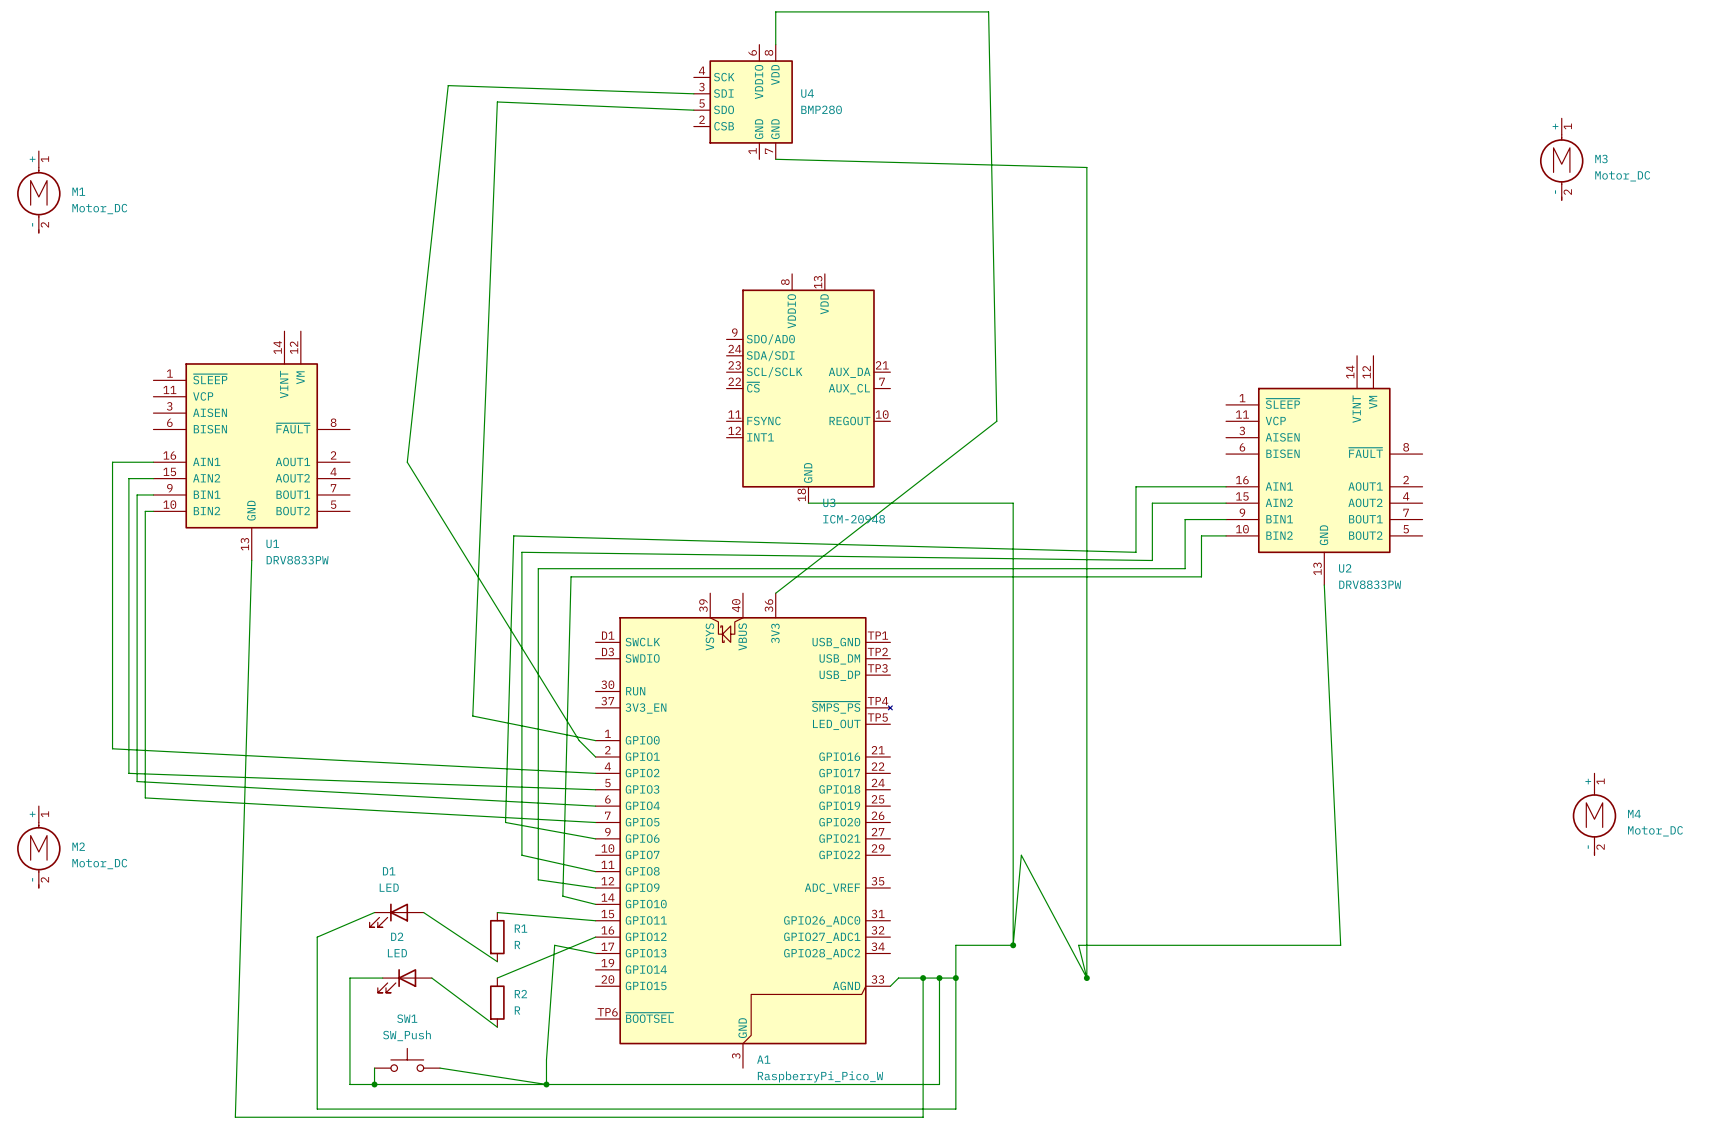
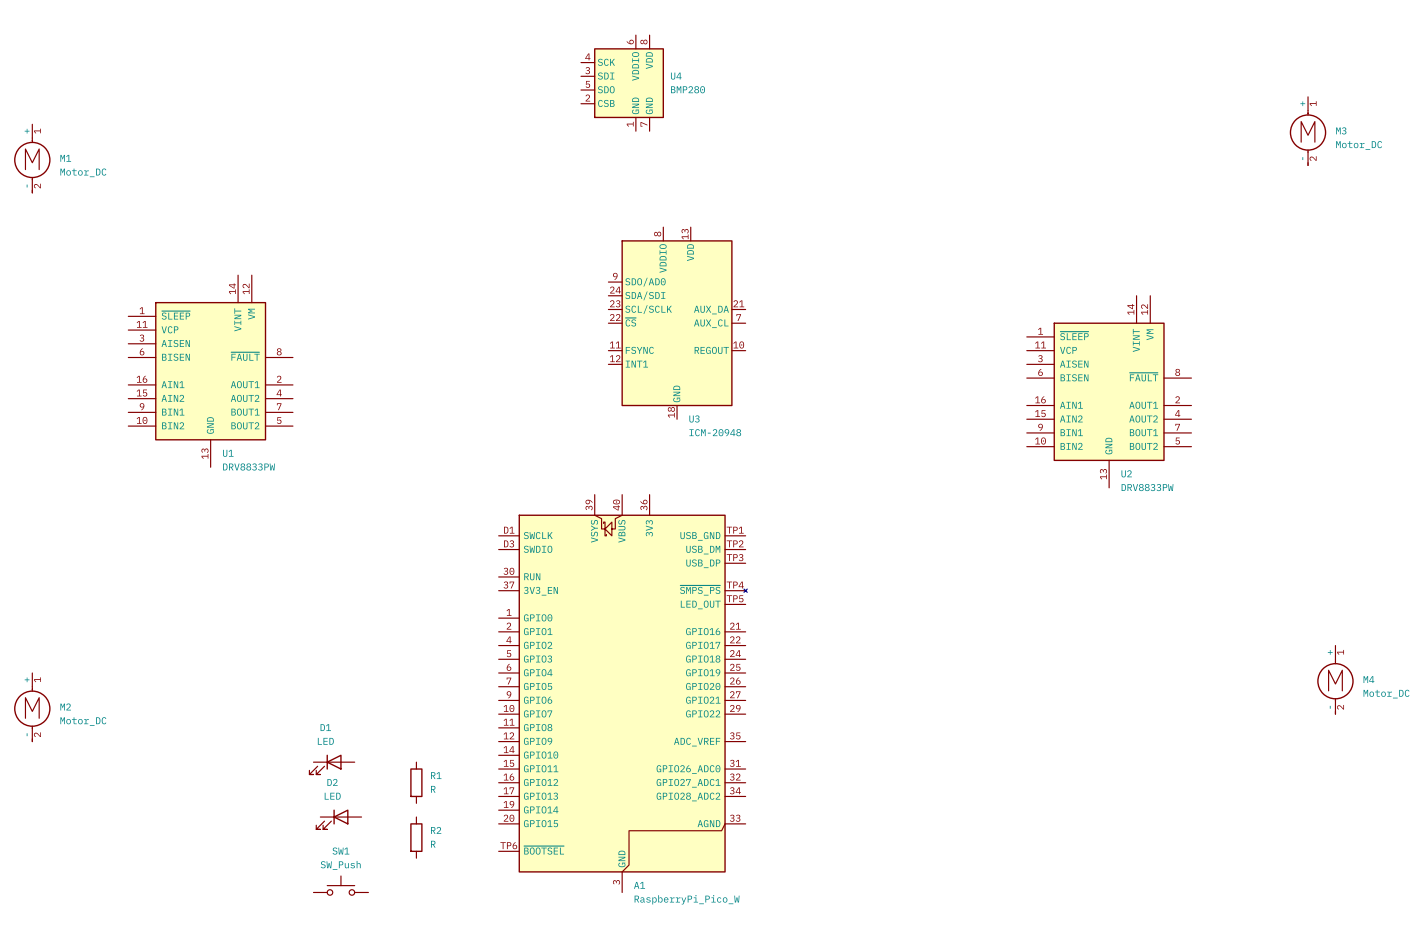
wire: (775, 44) (775, 11) (988, 11) (996, 421) (775, 593) -> none
wire: (693, 93) (448, 85) (407, 462) (579, 740) (595, 756) -> none
wire: (693, 110) (497, 101) (472, 716) (595, 740) -> none
wire: (775, 159) (1086, 167) (1086, 978) -> none
wire: (153, 462) (112, 462) (112, 748) (595, 773) -> none
wire: (153, 478) (128, 478) (128, 773) (595, 789) -> none
wire: (1226, 486) (1135, 486) (1135, 552) (513, 535) (505, 822) (595, 838) -> none
wire: (153, 494) (137, 494) (137, 781) (595, 806) -> none
wire: (808, 503) (1013, 503) (1013, 945) -> none
wire: (1226, 503) (1152, 503) (1152, 560) (521, 552) (521, 855) (595, 871) -> none
wire: (153, 511) (145, 511) (145, 797) (595, 822) -> none
wire: (1226, 519) (1185, 519) (1185, 568) (538, 568) (538, 879) (595, 887) -> none
wire: (1226, 535) (1201, 535) (1201, 576) (571, 576) (562, 896) (595, 904) -> none
wire: (251, 560) (235, 1117) (923, 1117) (923, 978) -> none
wire: (1324, 585) (1340, 945) (1078, 945) (1086, 978) -> none
wire: (374, 912) (317, 937) (317, 1109) (955, 1109) (955, 945) (1013, 945) -> none
wire: (423, 912) (497, 961) -> none
wire: (497, 912) (595, 920) -> none
wire: (595, 937) (497, 978) -> none
wire: (1013, 945) (1021, 855) (1086, 978) -> none
junction: (1013, 945) -> none
wire: (595, 953) (554, 945) (546, 1084) (440, 1068) -> none
wire: (382, 978) (349, 978) (349, 1084) (939, 1084) (939, 978) -> none
wire: (431, 978) (497, 1027) -> none
junction: (923, 978) -> none
junction: (939, 978) -> none
wire: (955, 978) (898, 978) (890, 986) -> none
junction: (955, 978) -> none
junction: (1086, 978) -> none
wire: (374, 1068) (374, 1084) -> none
junction: (374, 1084) -> none
junction: (546, 1084) -> none

